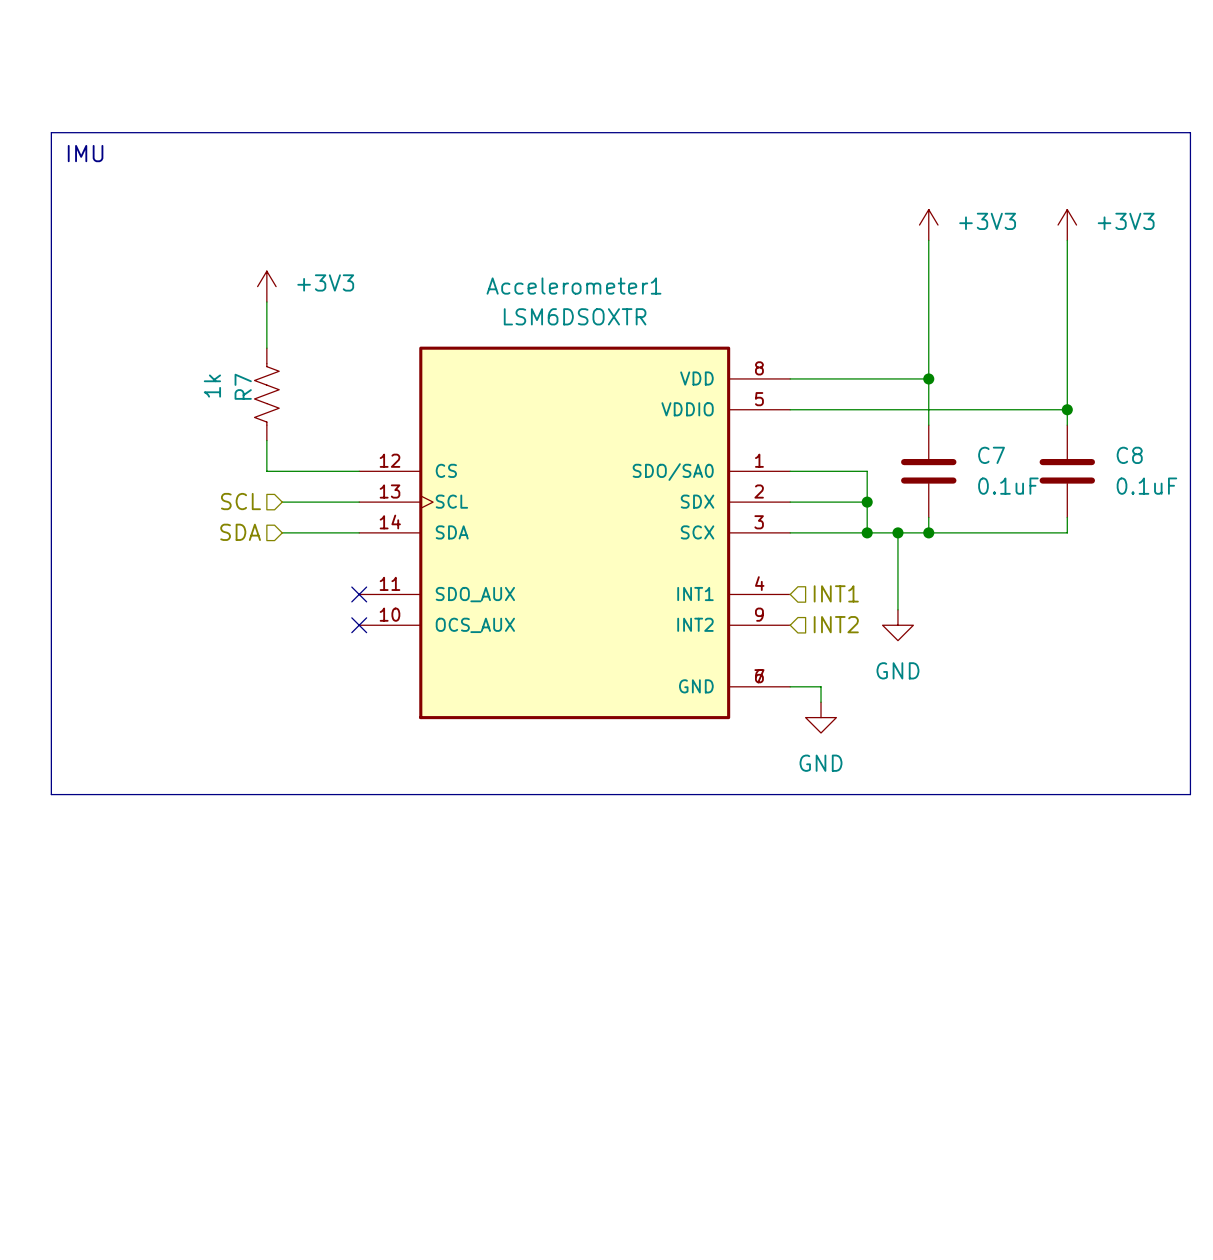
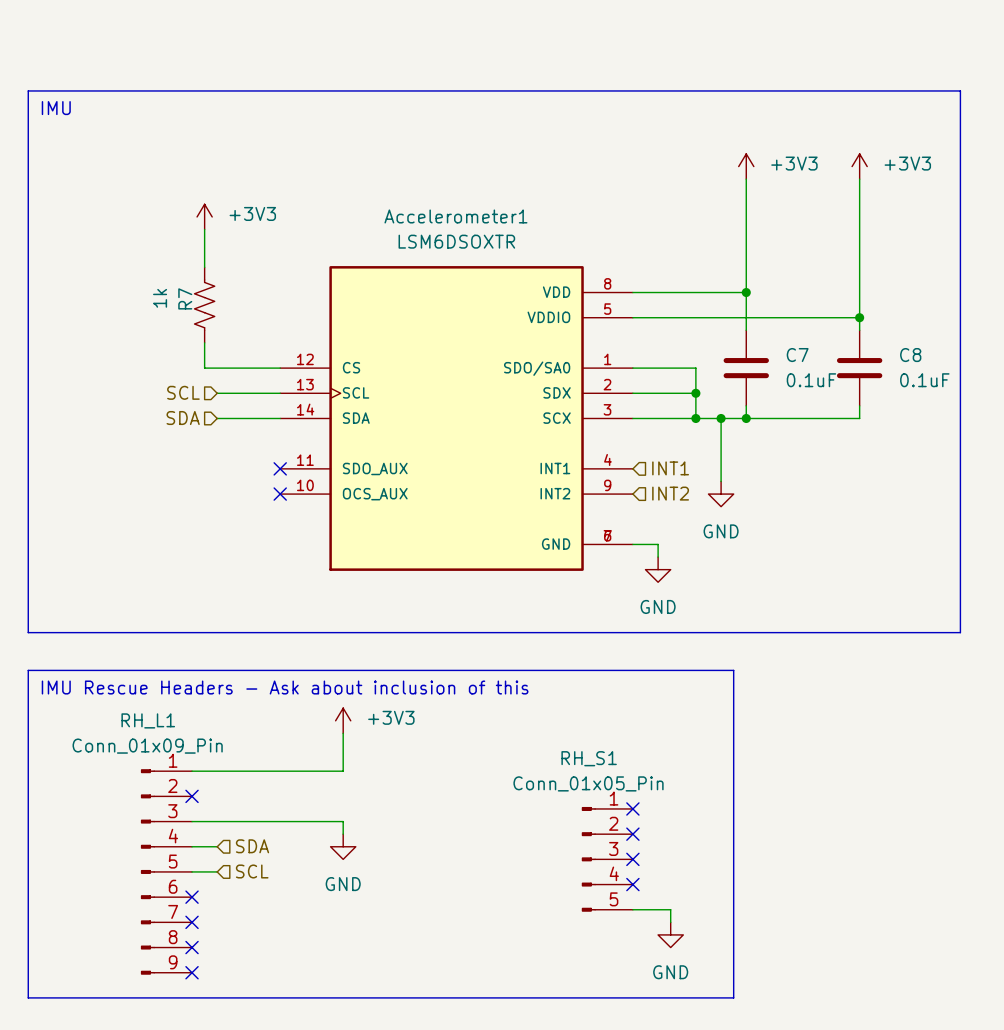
line: none -> (28, 670) (733, 670) (733, 997) (28, 997) (28, 670)
text: none -> IMU Rescue Headers - Ask about inclusion of this (285, 687)
power symbol: none -> +3V3 (343, 720)
wire: none -> (343, 733) (343, 771) (192, 771)
no-connect mark: none -> (192, 796)
no-connect mark: none -> (632, 808)
wire: none -> (192, 821) (343, 821) (343, 834)
no-connect mark: none -> (632, 834)
hierarchical label: none -> SDA (252, 846)
wire: none -> (192, 846) (217, 846)
power symbol: none -> GND (343, 846)
RH_S1: none -> Conn_01x05_Pin (607, 859)
no-connect mark: none -> (632, 859)
hierarchical label: none -> SCL (252, 871)
RH_L1: none -> Conn_01x09_Pin (166, 871)
wire: none -> (192, 871) (217, 871)
no-connect mark: none -> (632, 884)
no-connect mark: none -> (192, 897)
wire: none -> (632, 909) (670, 909) (670, 922)
no-connect mark: none -> (192, 922)
power symbol: none -> GND (670, 934)
no-connect mark: none -> (192, 947)
no-connect mark: none -> (192, 972)

